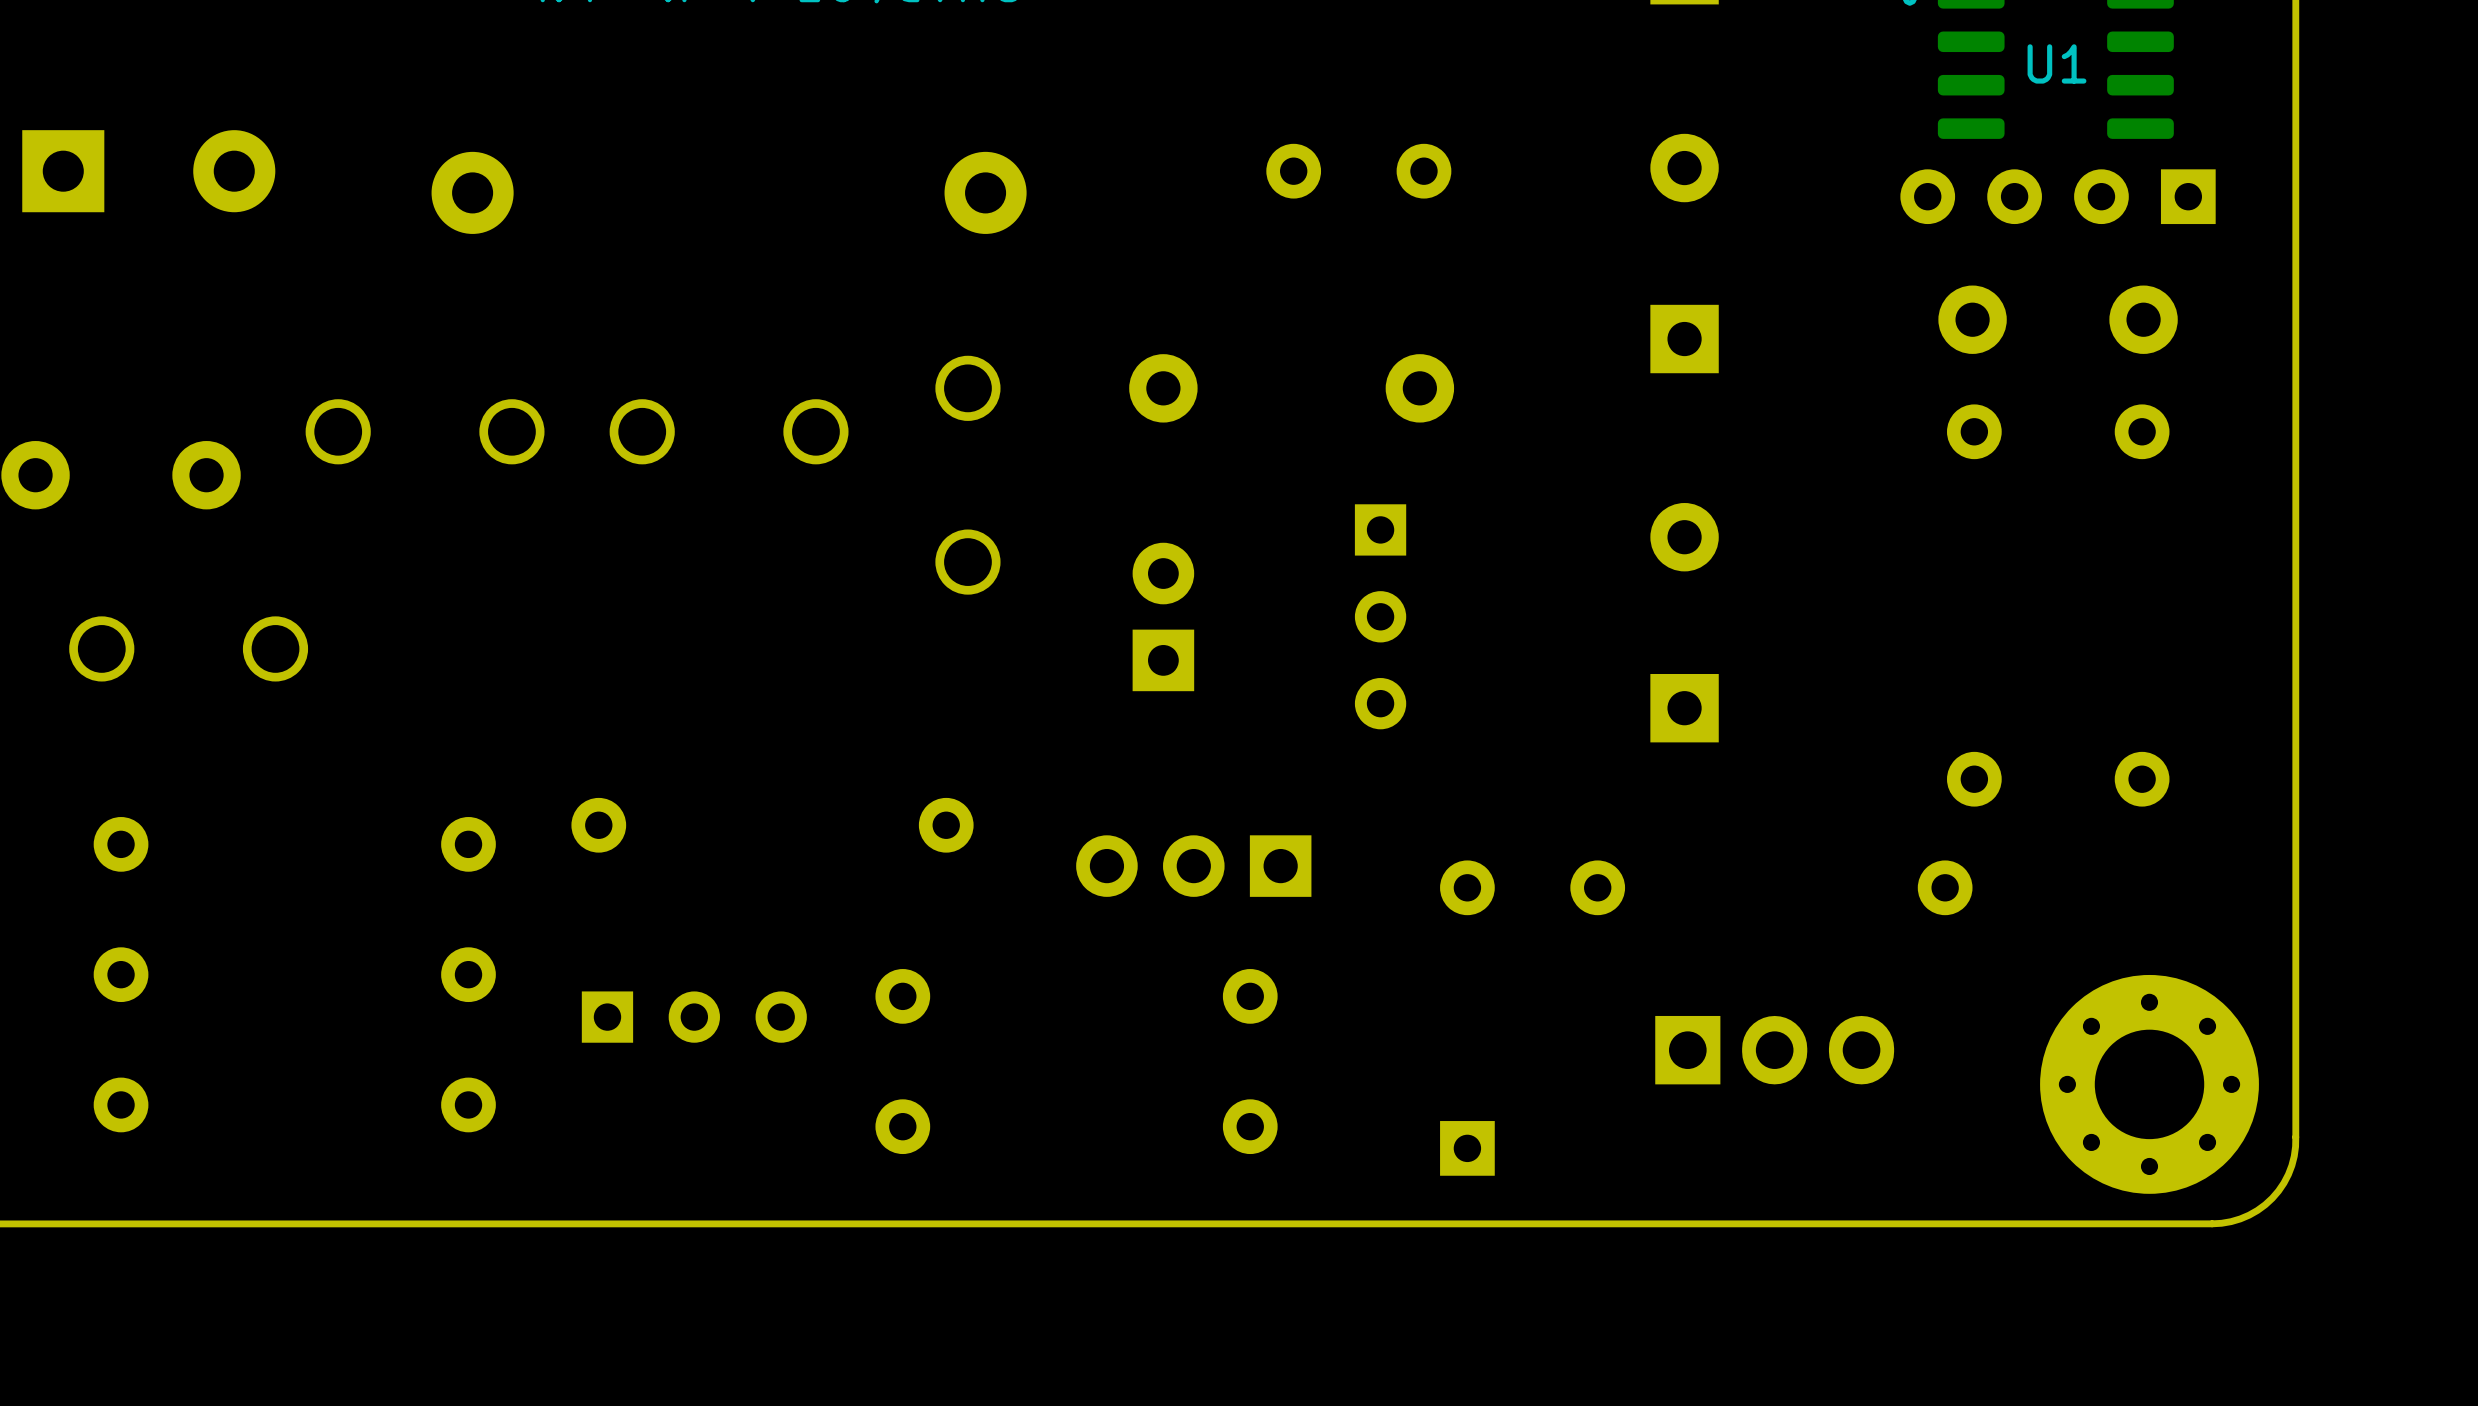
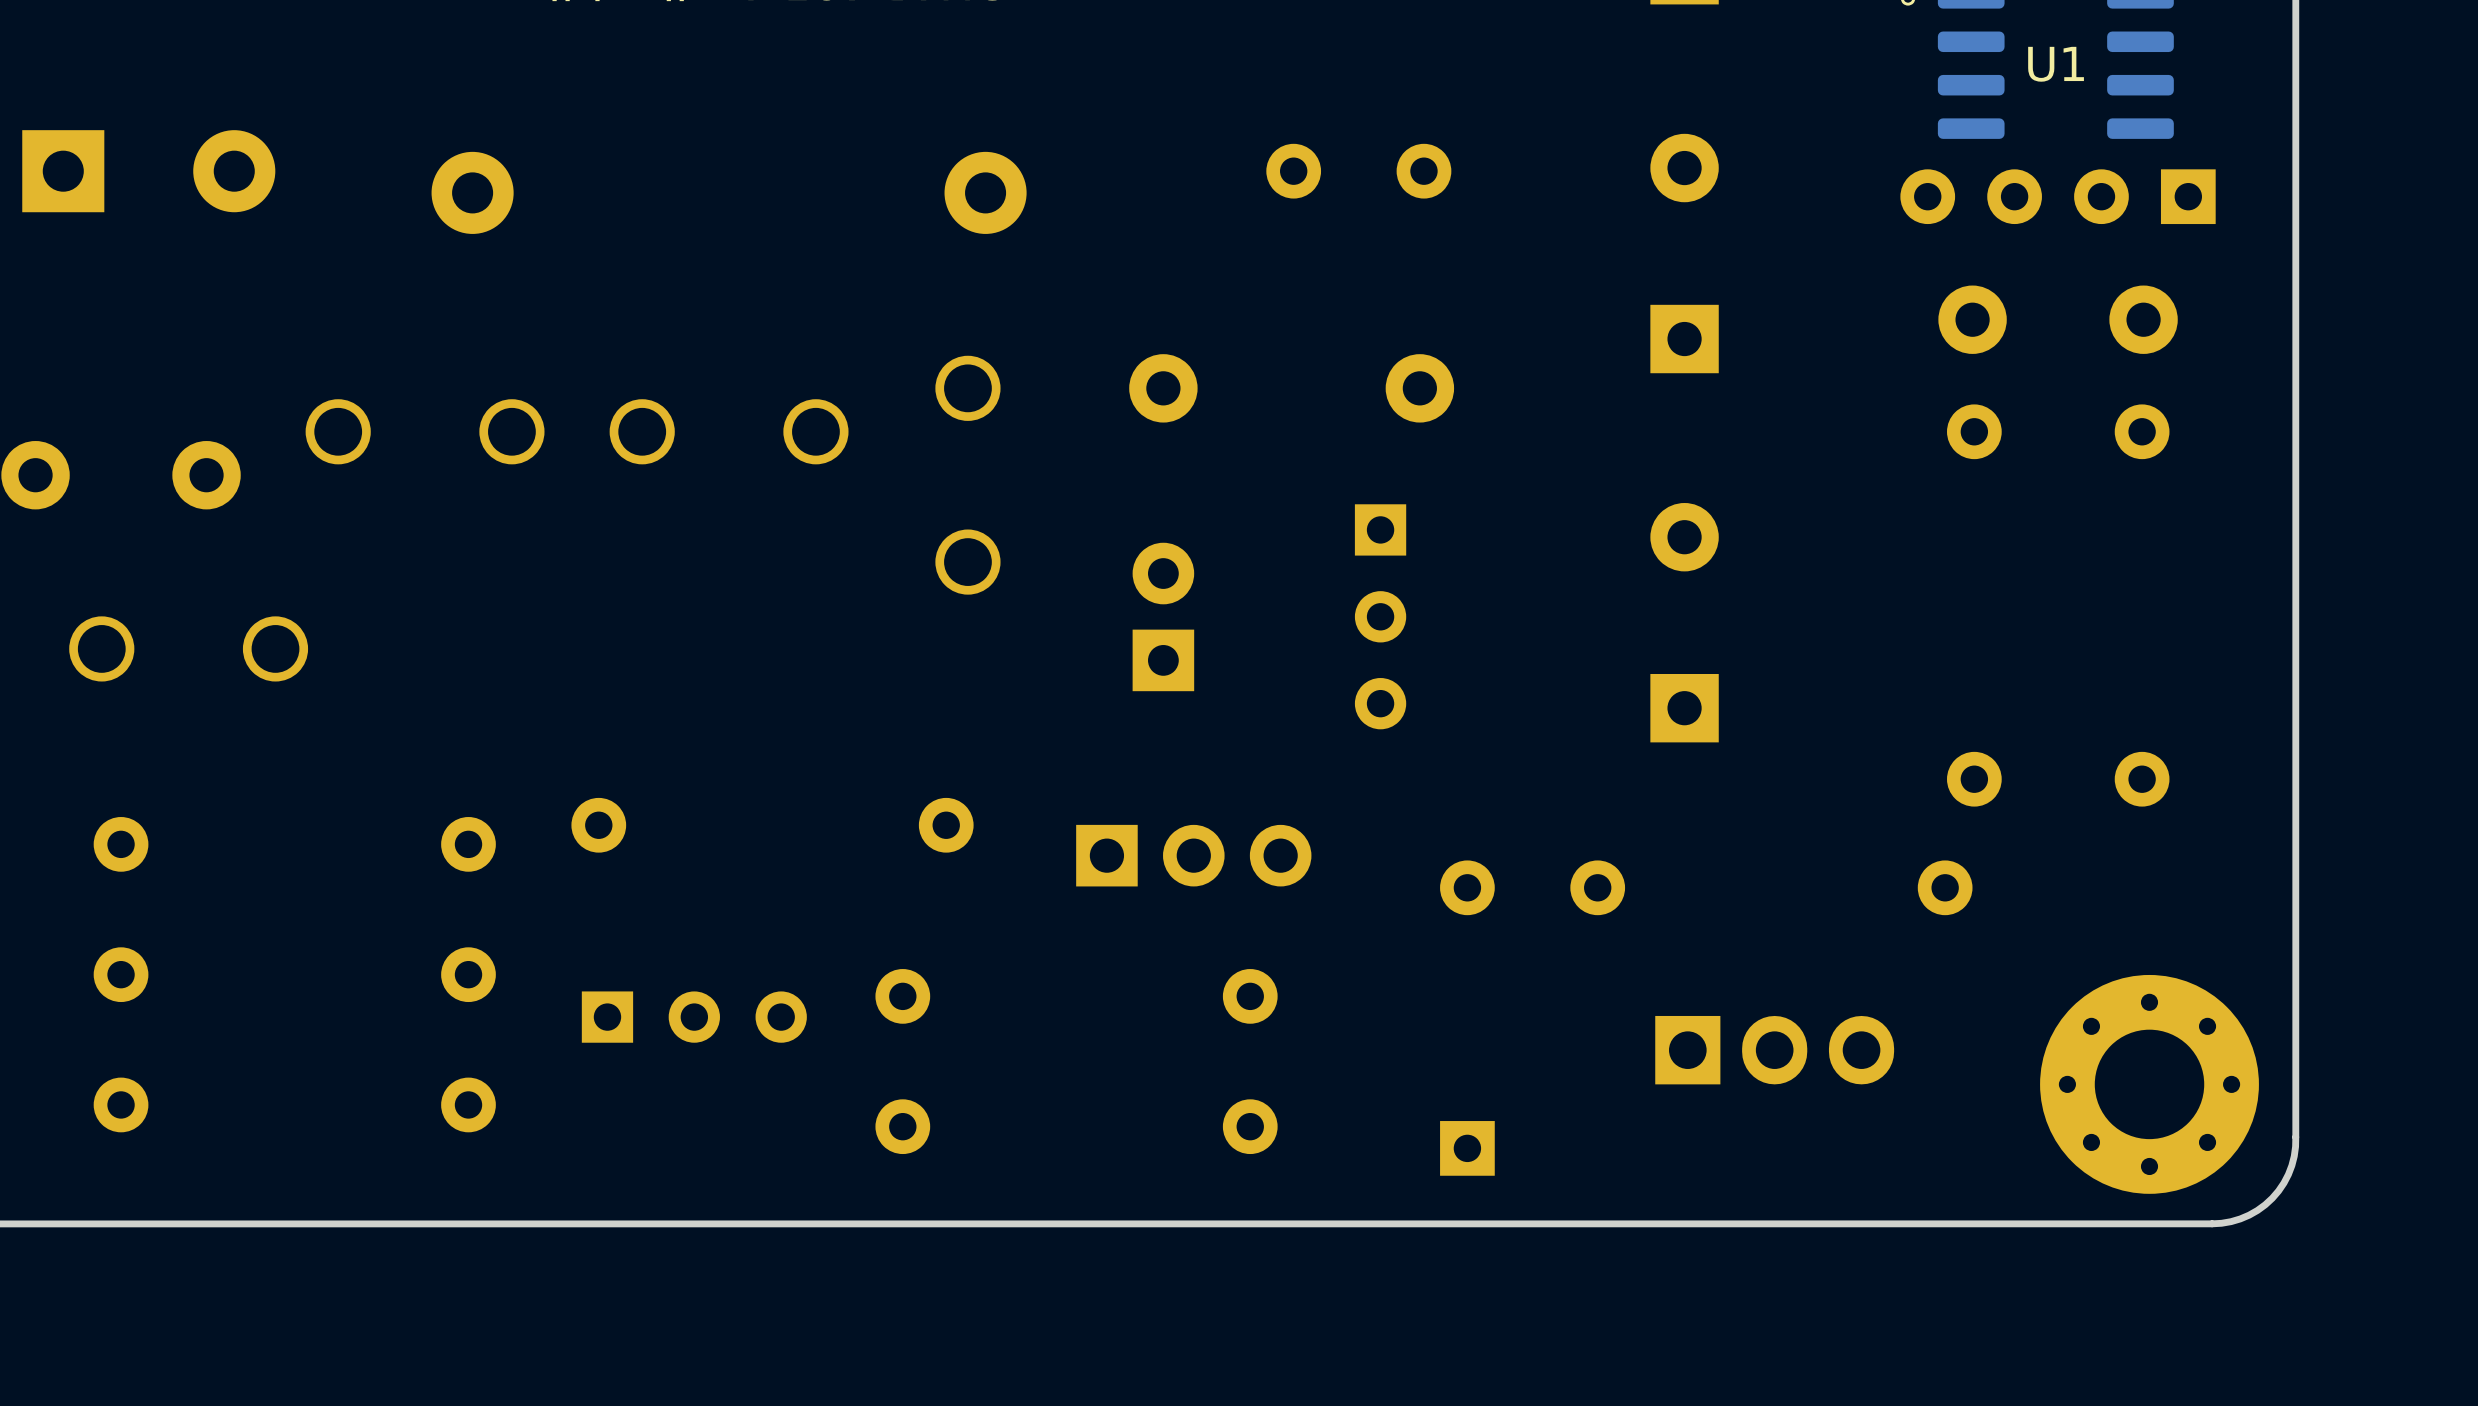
part rotation: 0° (1193, 866) -> 180° (1193, 855)

